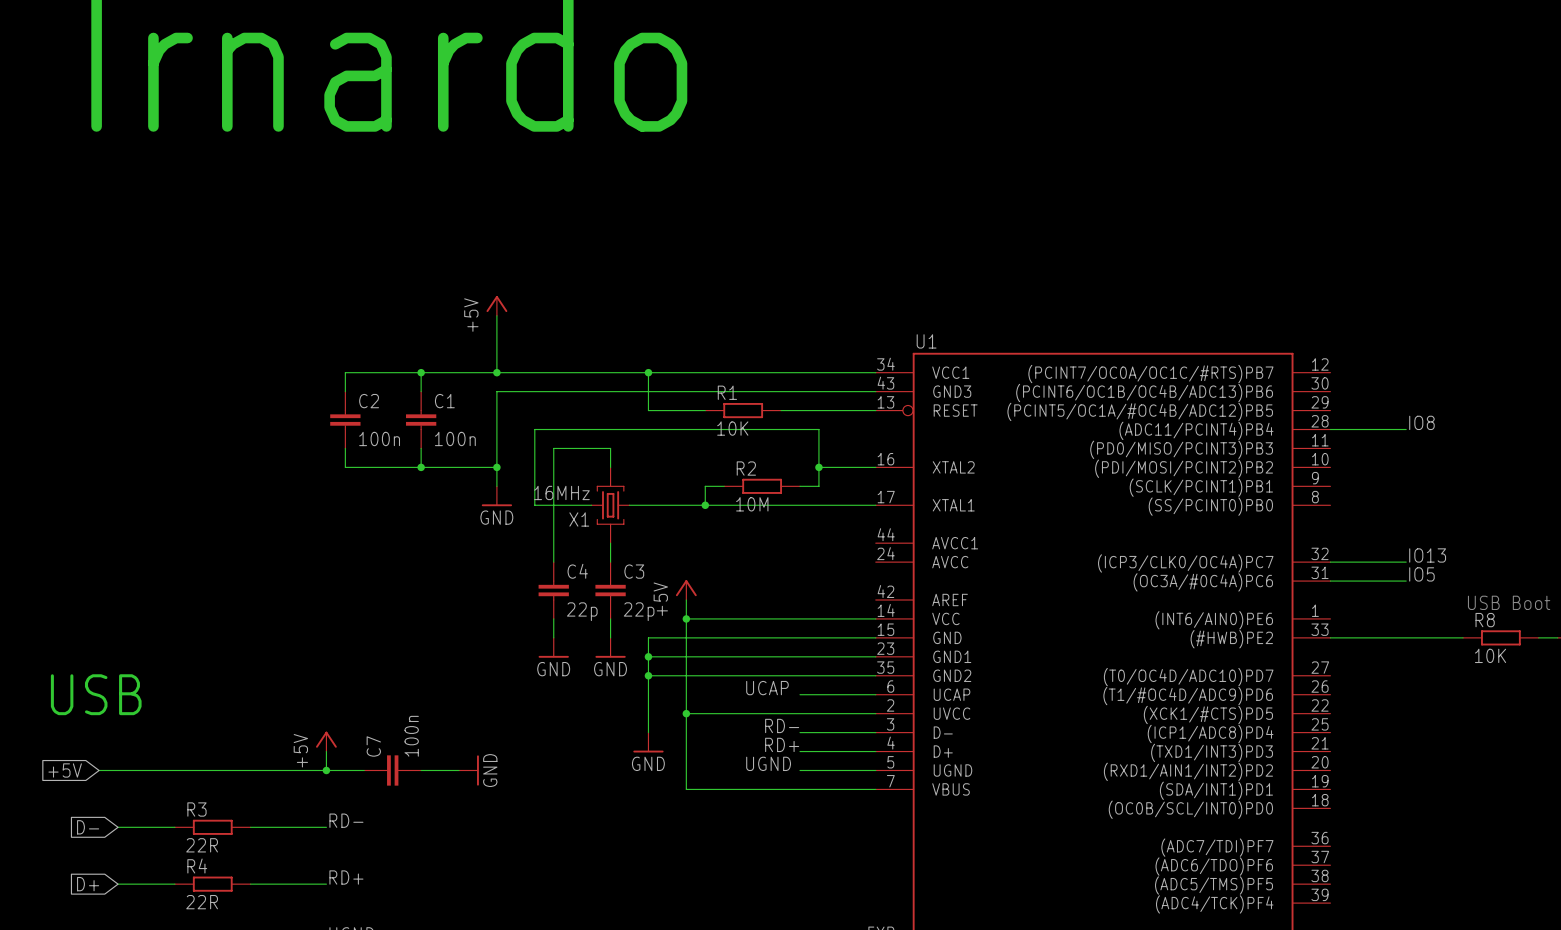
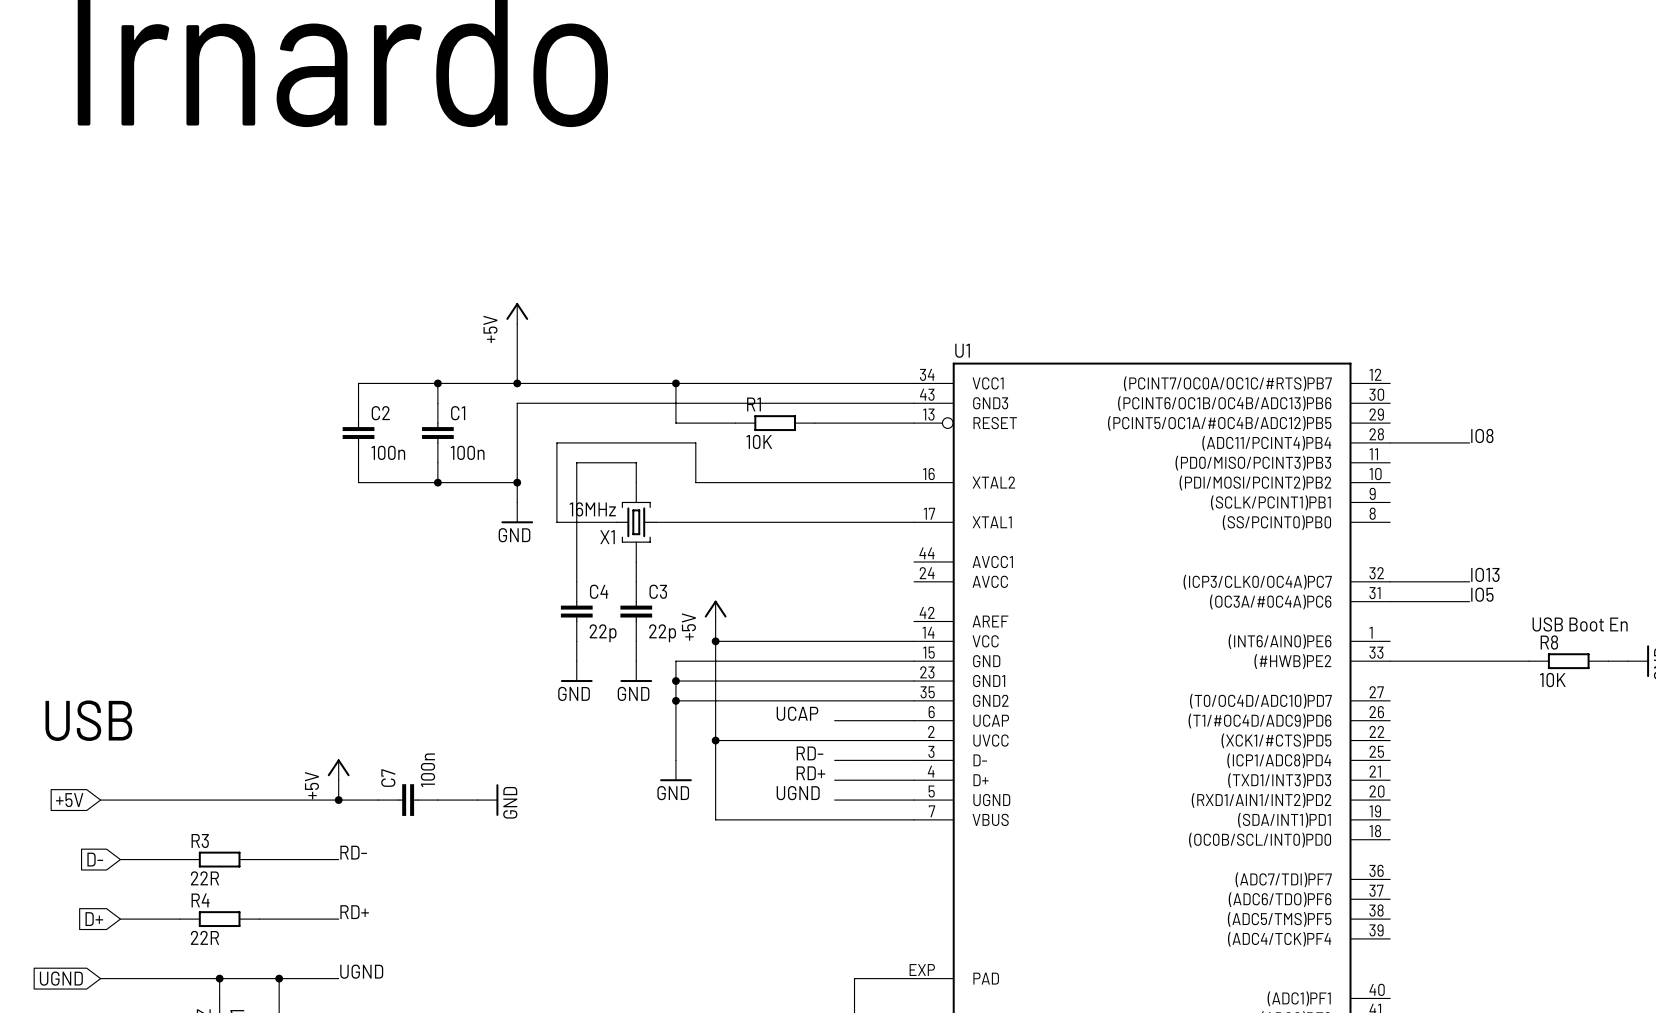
wire: (667, 429) (818, 429) (818, 486) (800, 486) -> (695, 442) (695, 482) (854, 482)
junction: (818, 467) -> none
wire: (724, 486) (705, 486) (705, 505) -> none
R2: 10M (762, 486) -> none
junction: (705, 505) -> none

